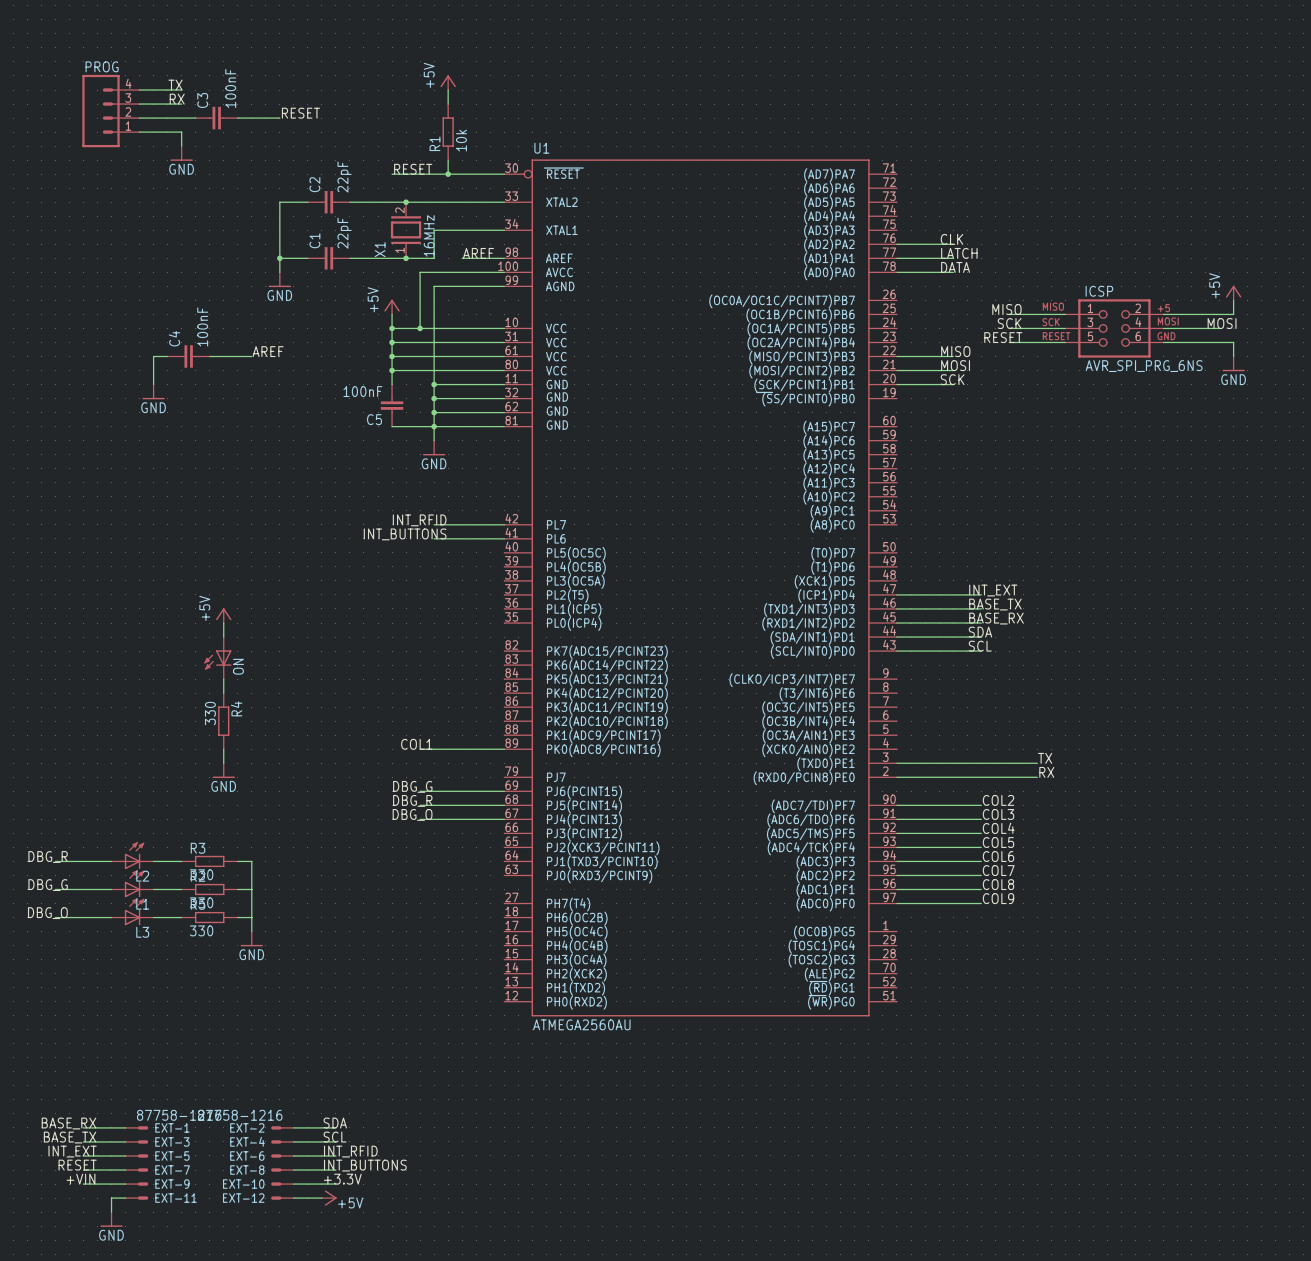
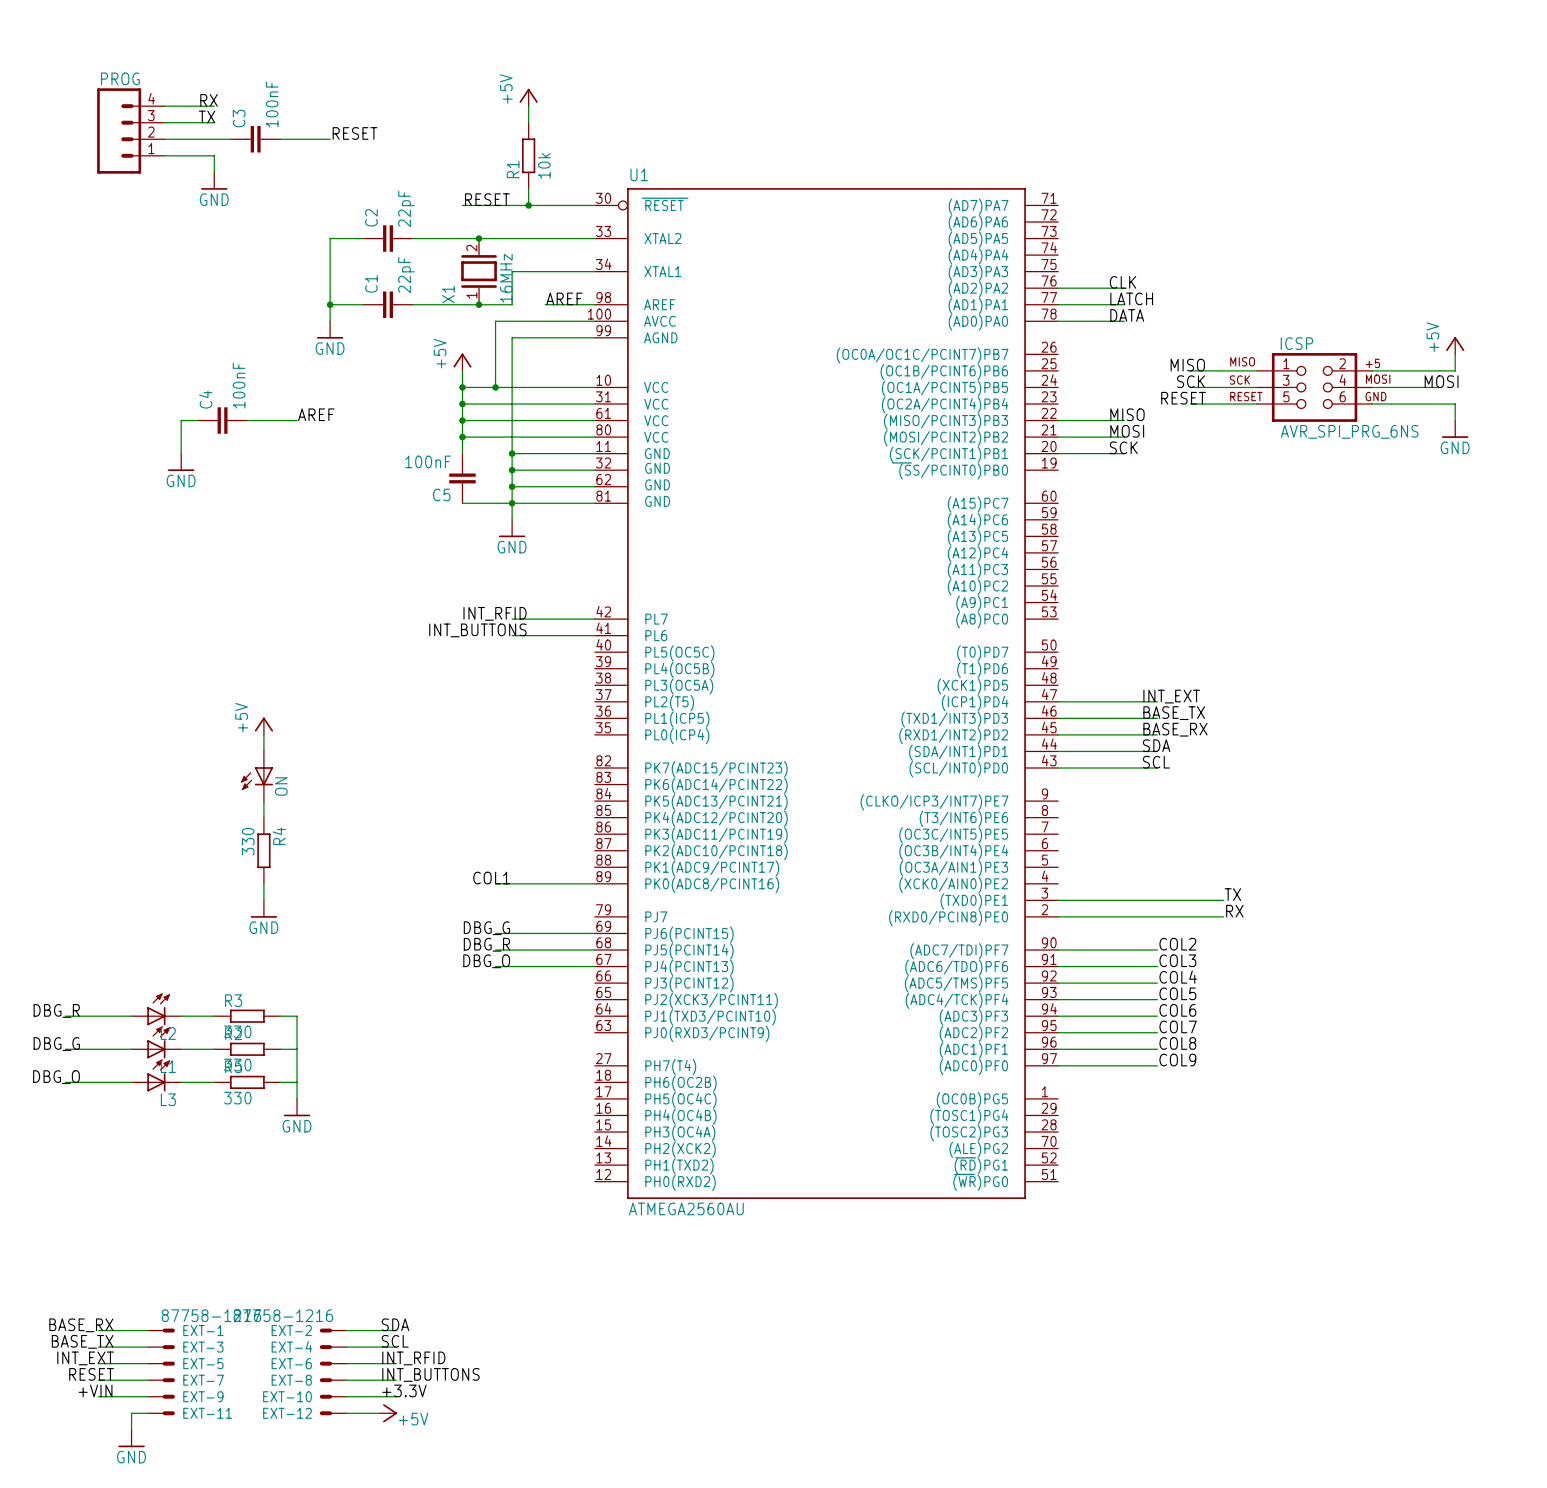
label: TX (175, 85) -> RX (209, 100)
label: RX (177, 99) -> TX (207, 116)

